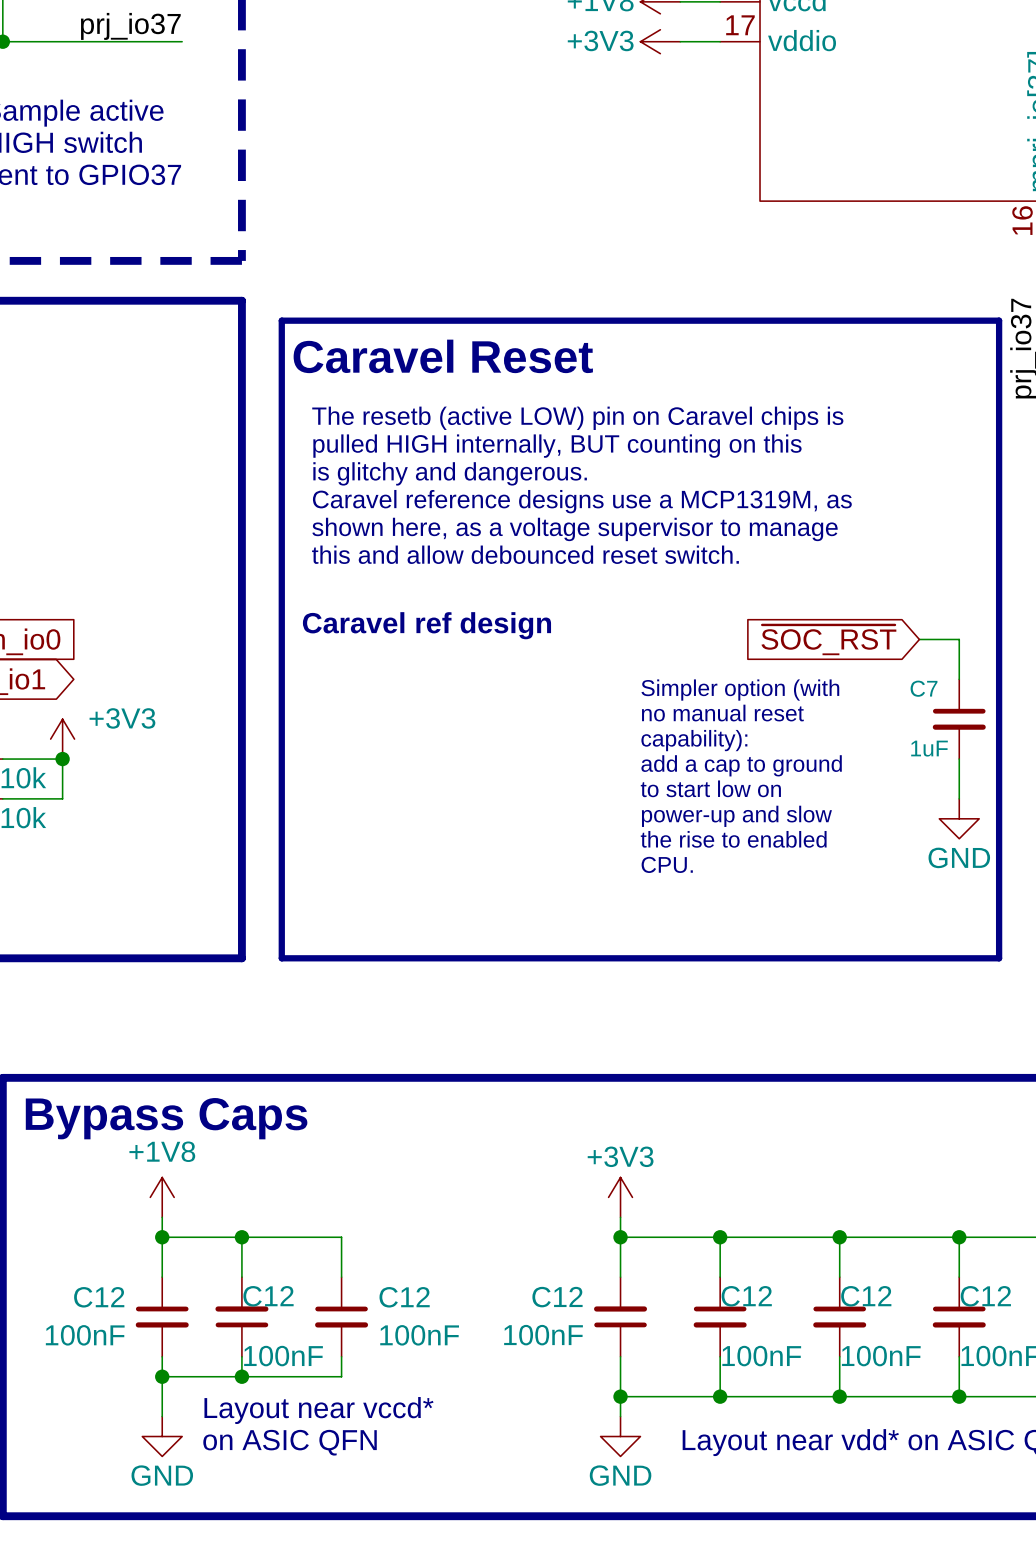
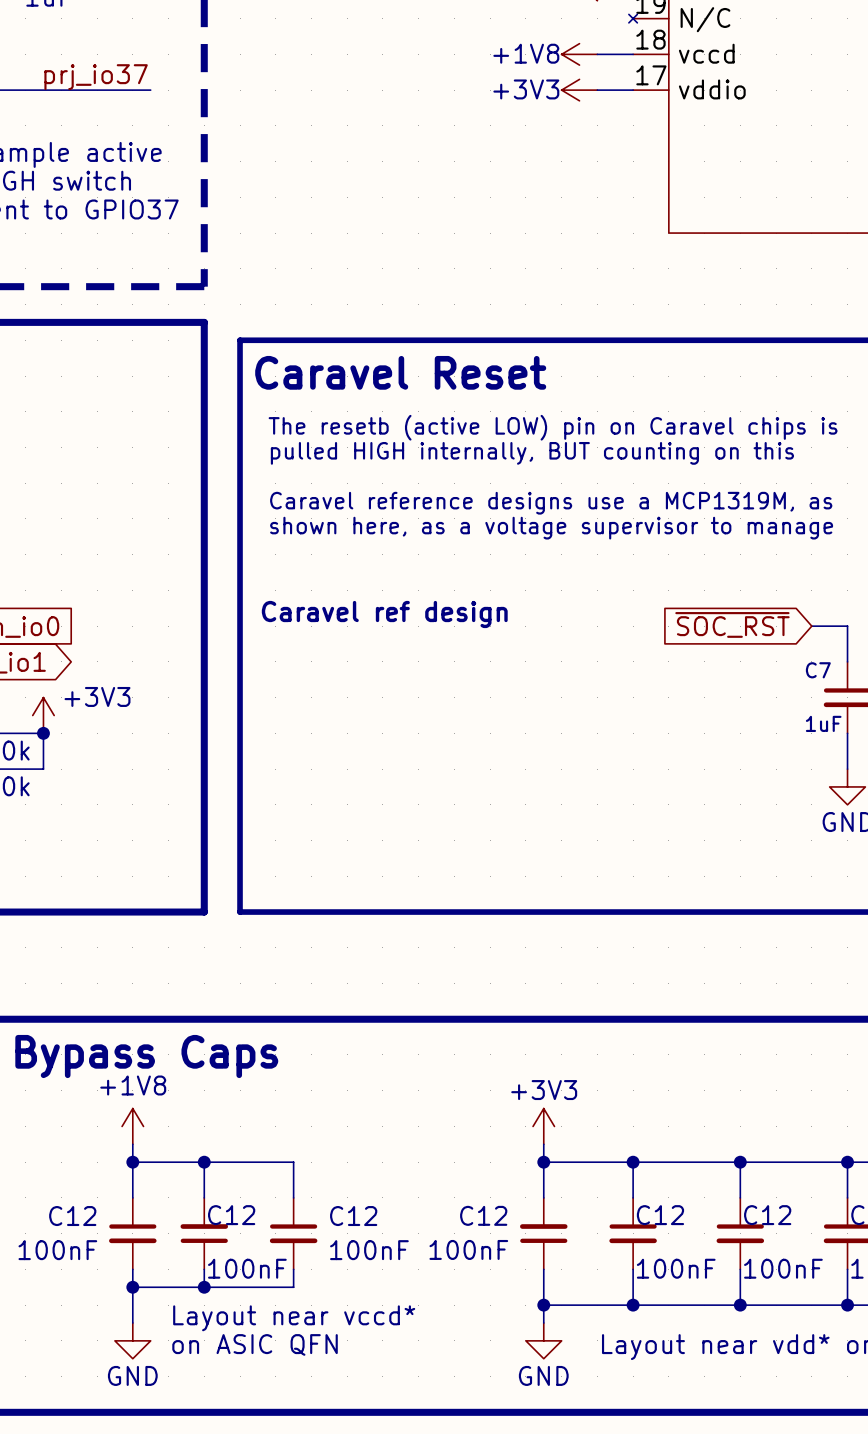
text: is glitchy and dangerous. (450, 473) -> none
text: this and allow debounced reset switch. (525, 554) -> none
text: Simpler option (with (740, 690) -> none
text: no manual reset (722, 713) -> none
text: capability): (694, 740) -> none
text: add a cap to ground (741, 765) -> none
text: to start low on (710, 788) -> none
text: power-up and slow (736, 816) -> none
text: the rise to enabled (733, 839) -> none
text: CPU. (667, 864) -> none

